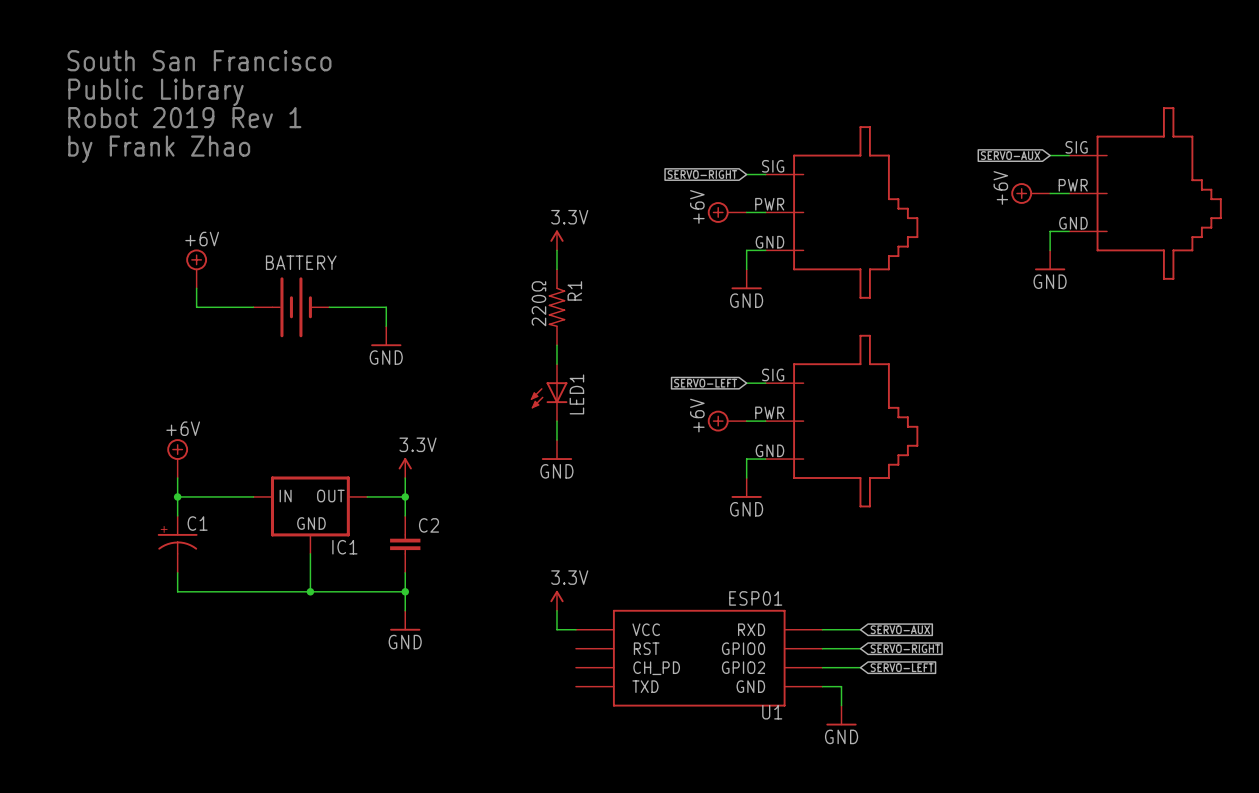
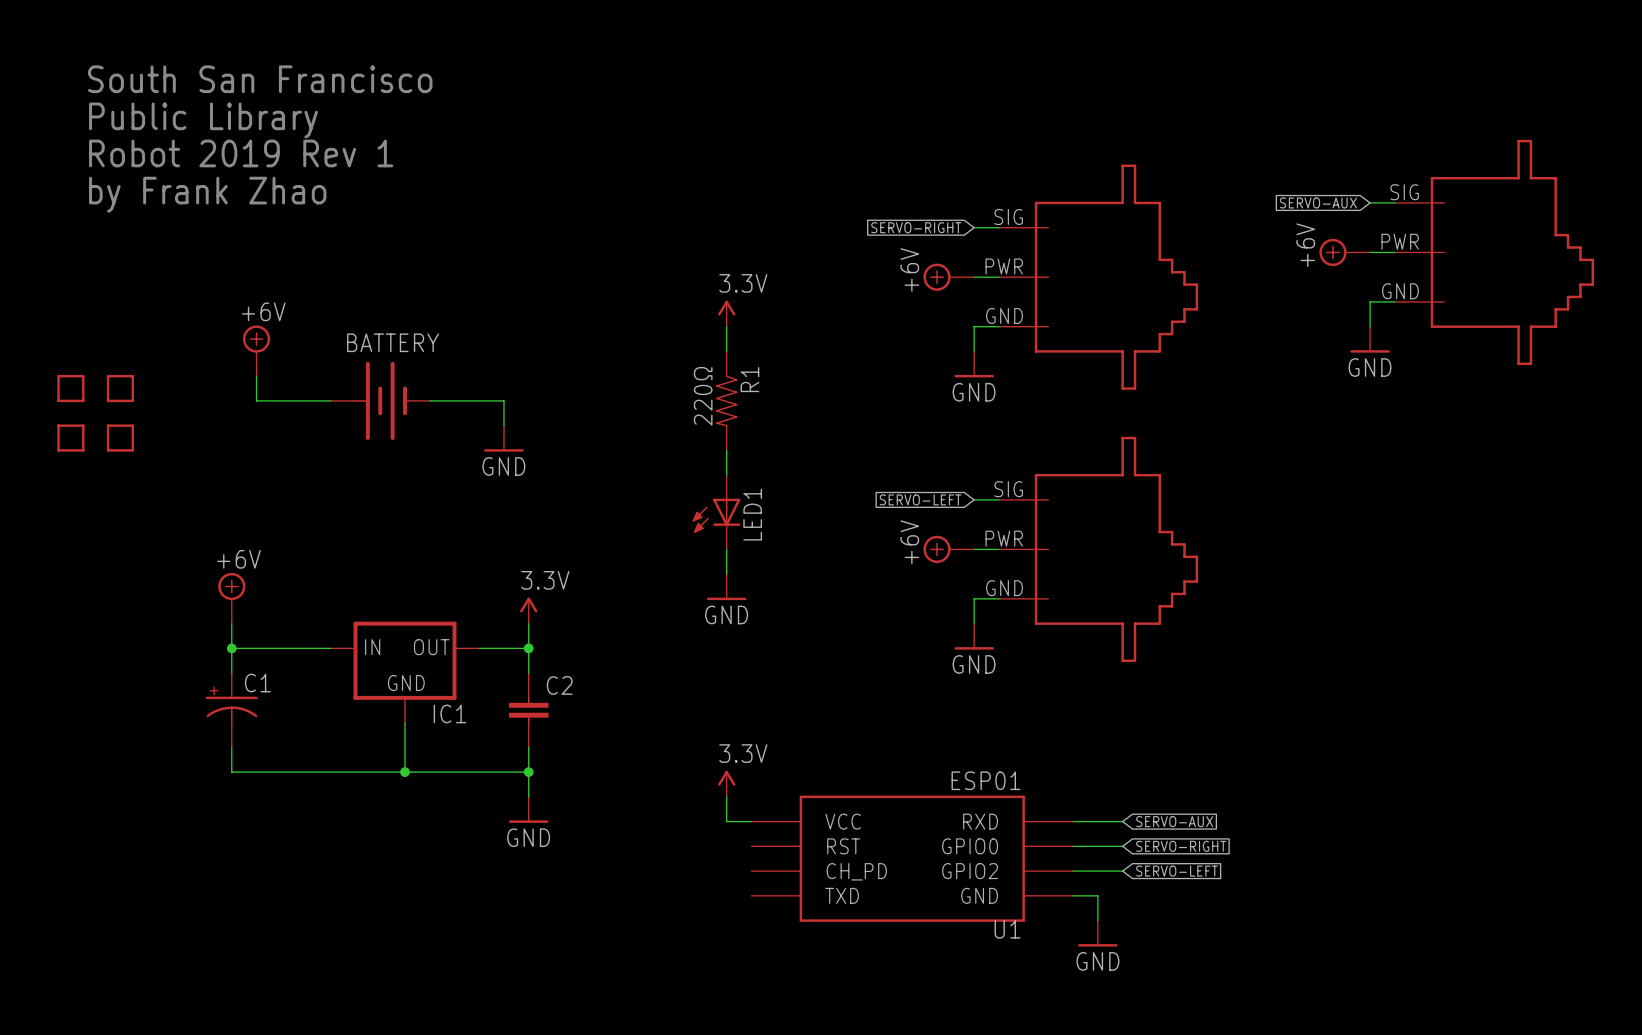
part: none -> (70, 388)
part: none -> (120, 388)
part: none -> (70, 438)
part: none -> (120, 438)

